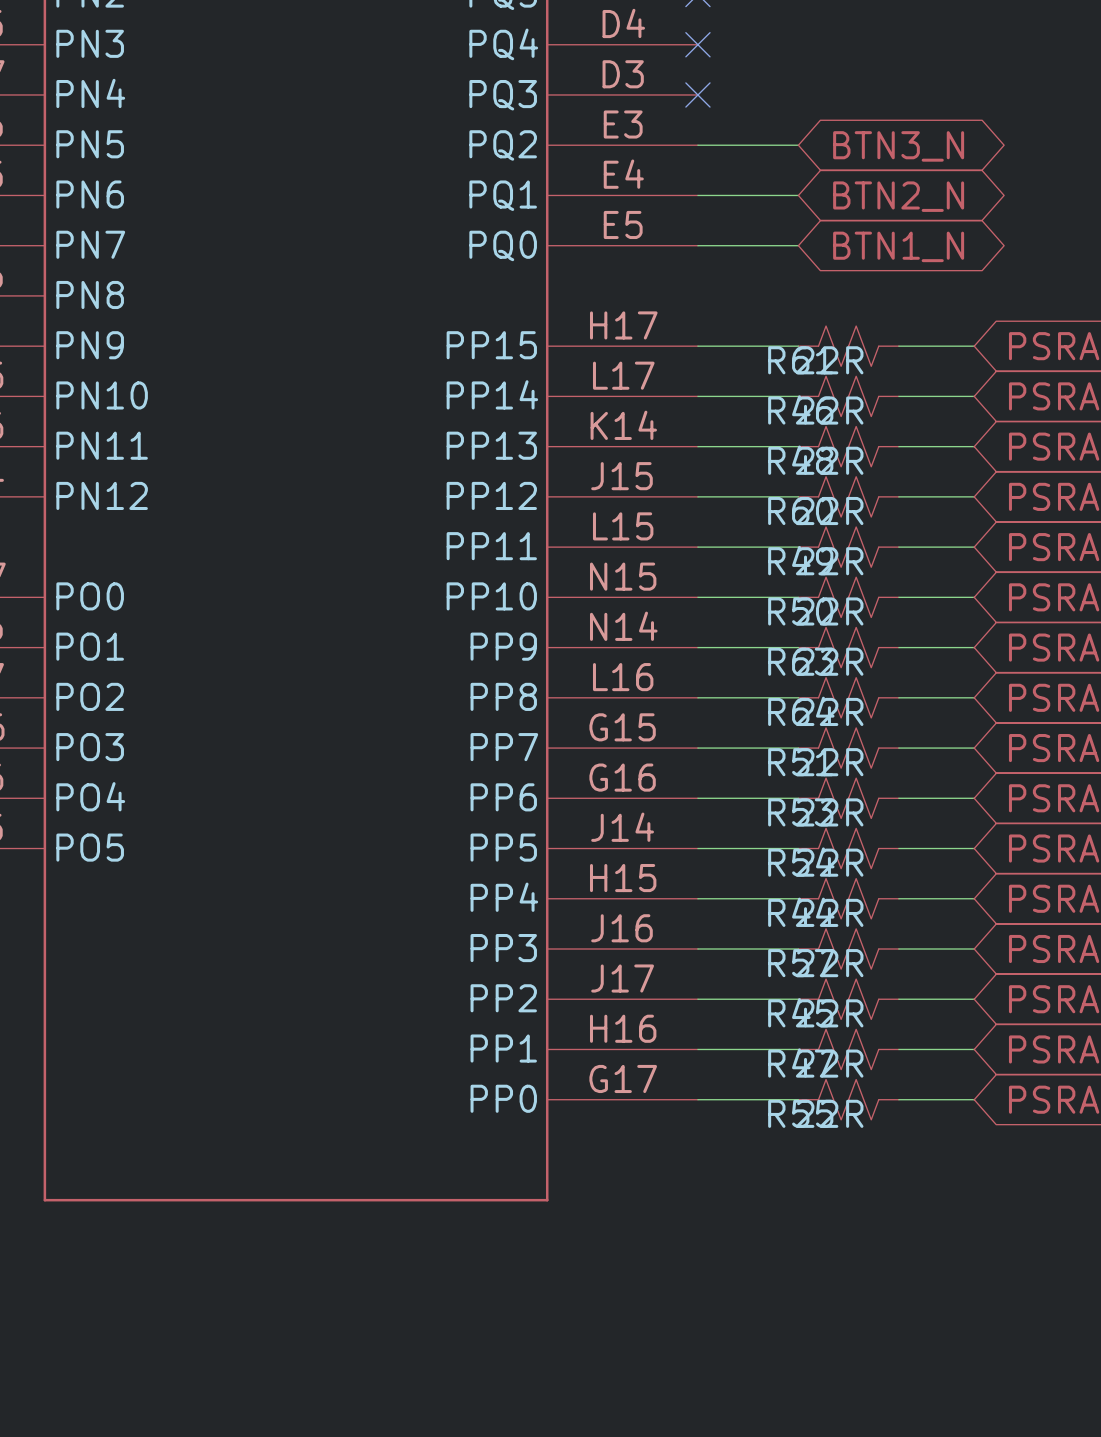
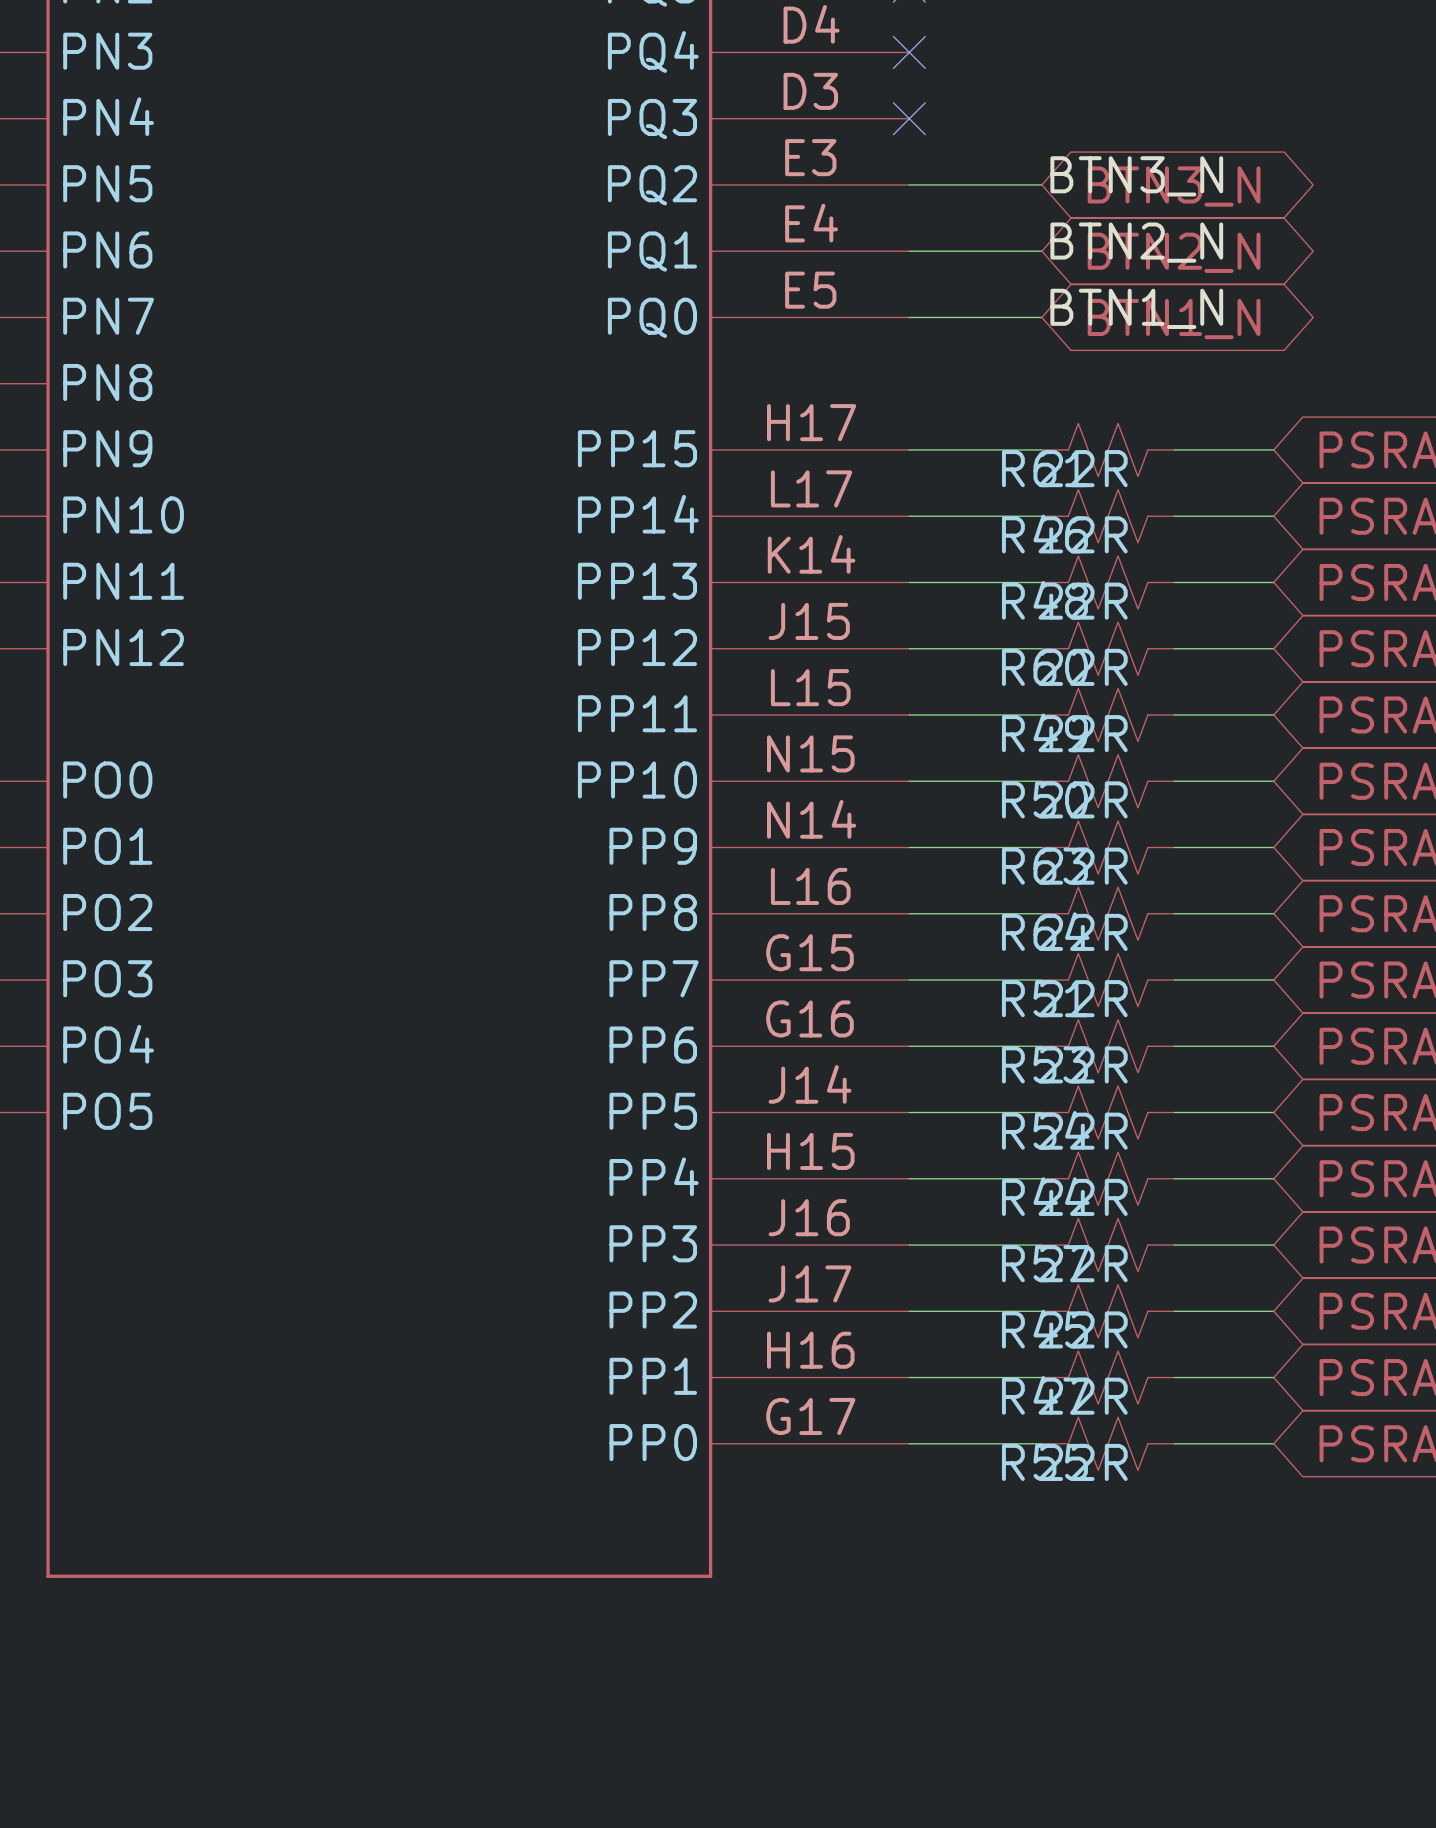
label: none -> BTN3_N (1136, 176)
label: none -> BTN2_N (1136, 242)
label: none -> BTN1_N (1136, 308)

